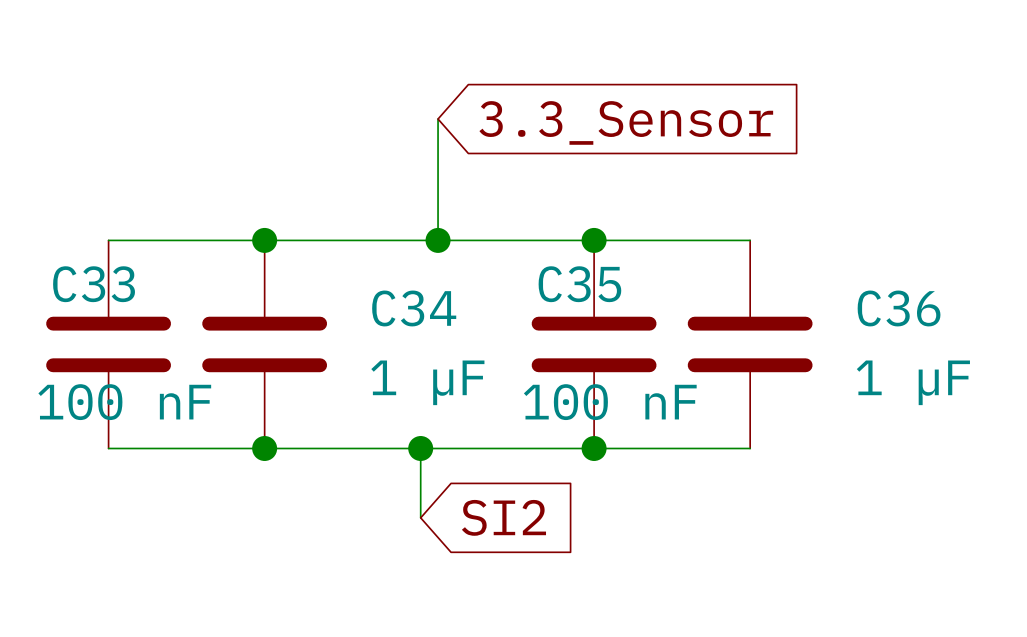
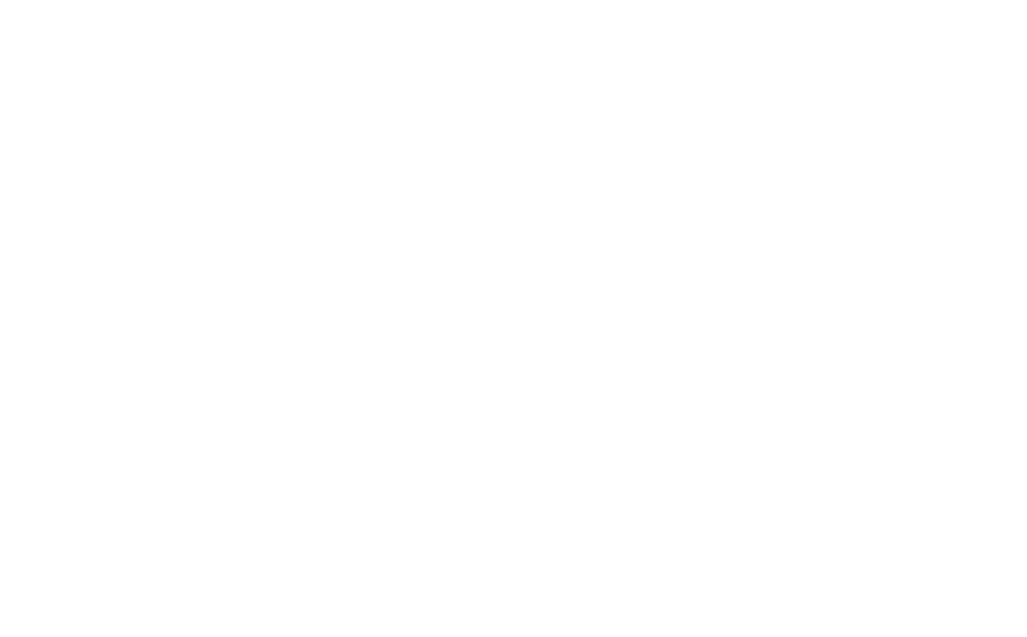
wire: (438, 119) (438, 240) -> none
global label: 3.3_Sensor (626, 122) -> none
wire: (108, 240) (750, 240) -> none
junction: (264, 240) -> none
junction: (438, 240) -> none
junction: (594, 240) -> none
C33: 100 nF (108, 344) -> none
C34: 1 µF (264, 344) -> none
C35: 100 nF (594, 344) -> none
C36: 1 µF (750, 344) -> none
wire: (108, 448) (750, 448) -> none
junction: (264, 448) -> none
wire: (420, 448) (420, 517) -> none
junction: (420, 448) -> none
junction: (594, 448) -> none
global label: SI2 (503, 517) -> none

